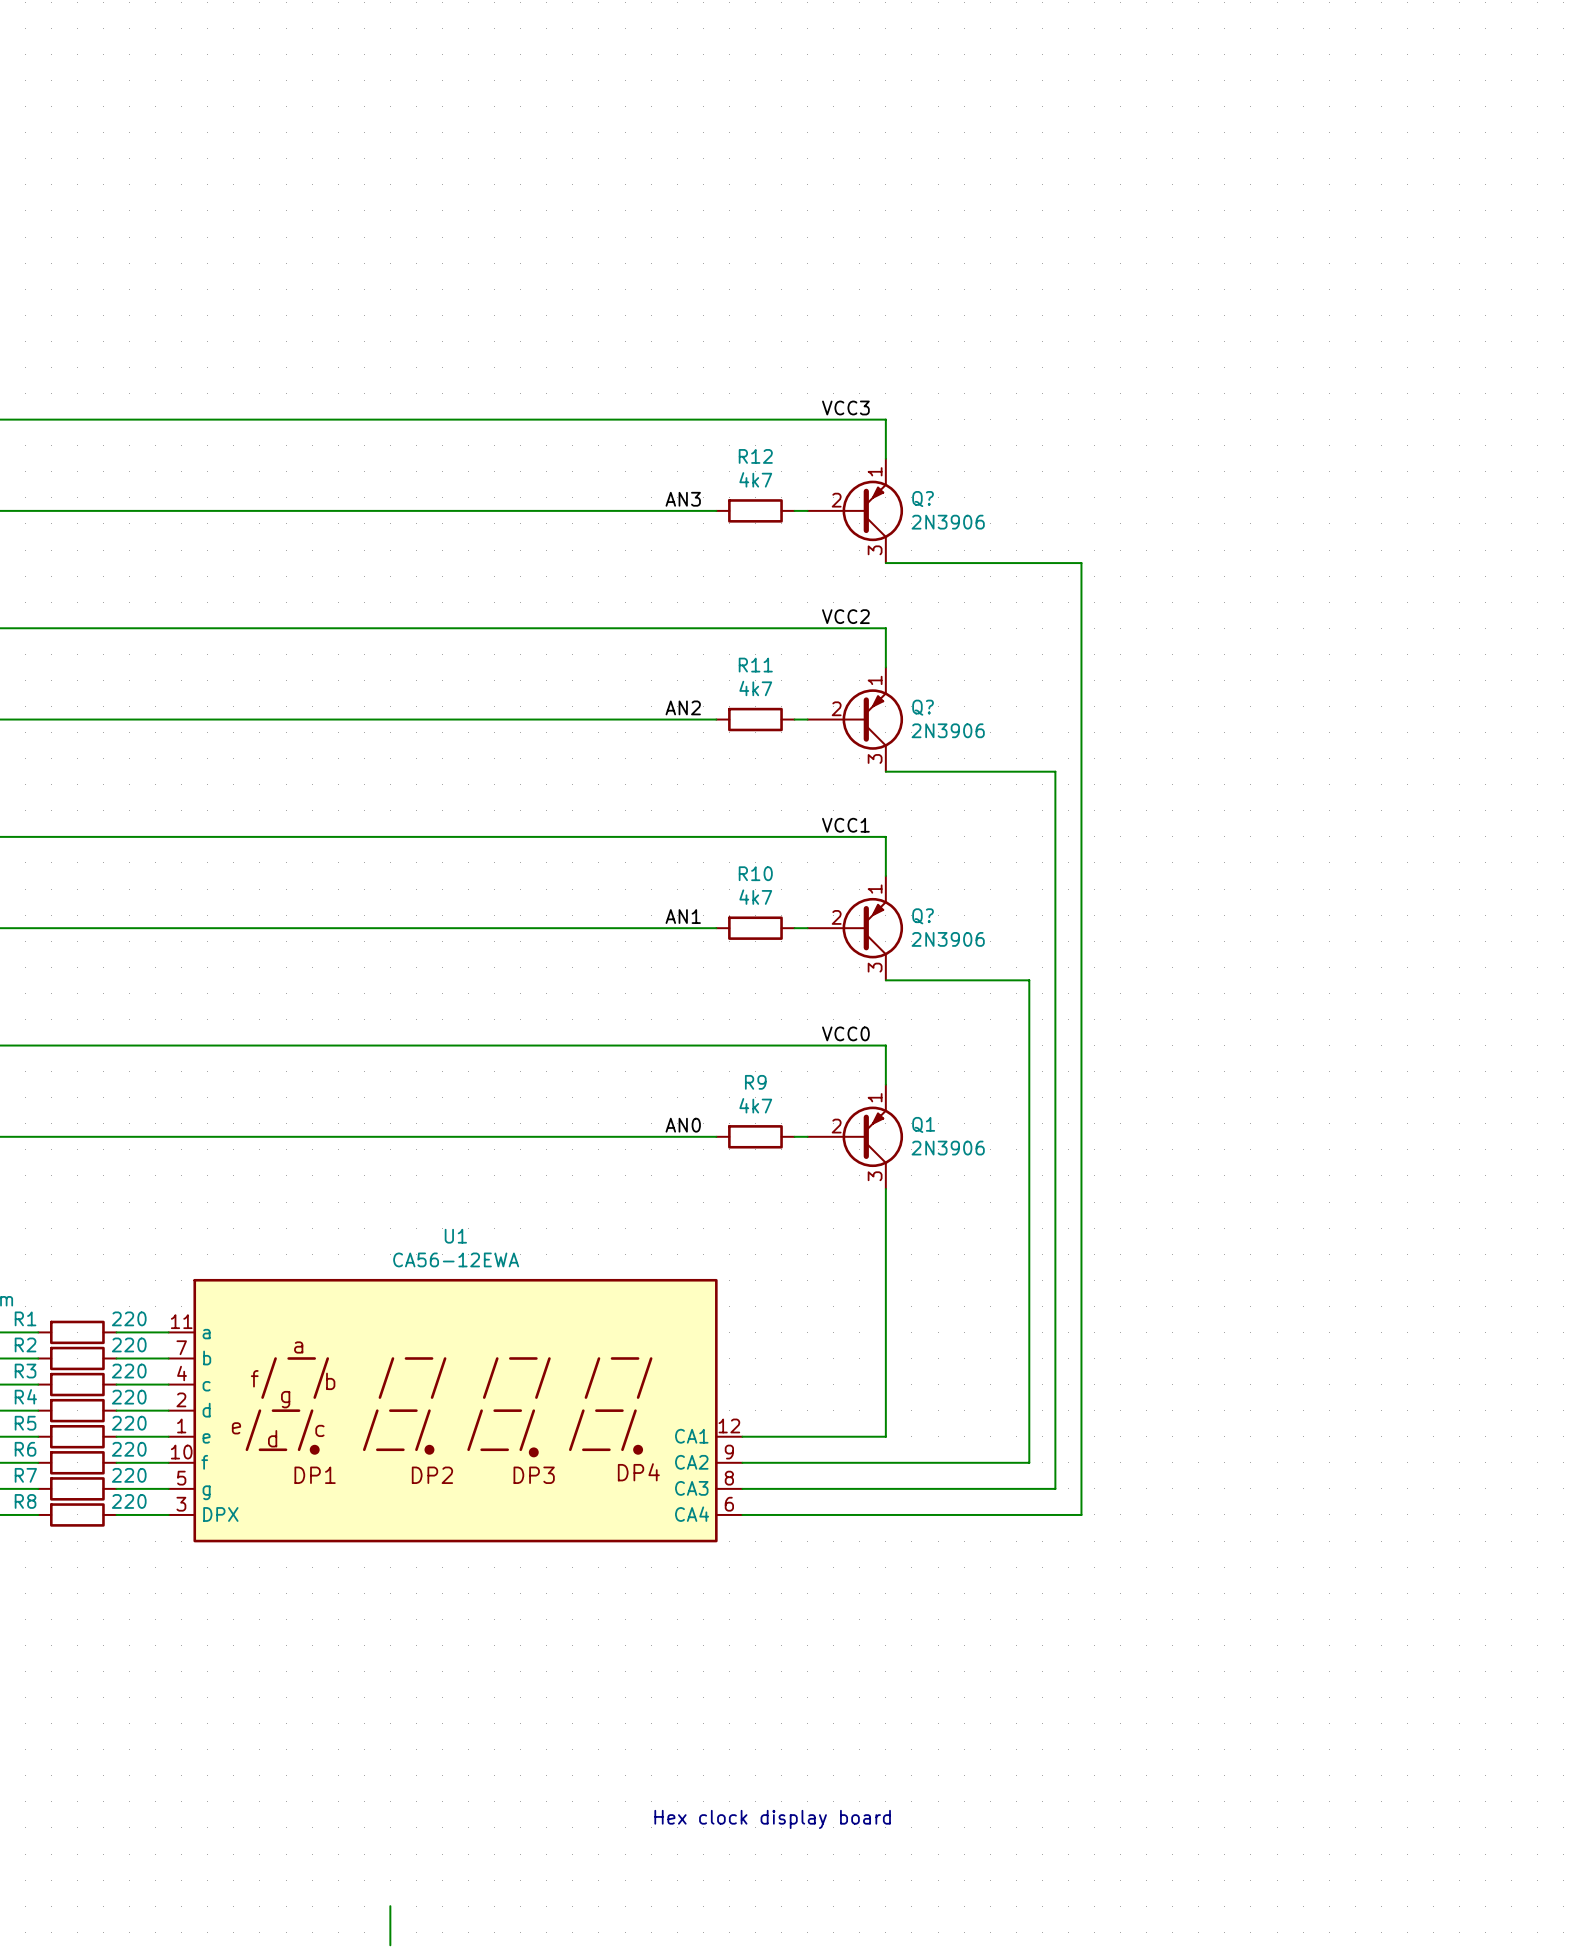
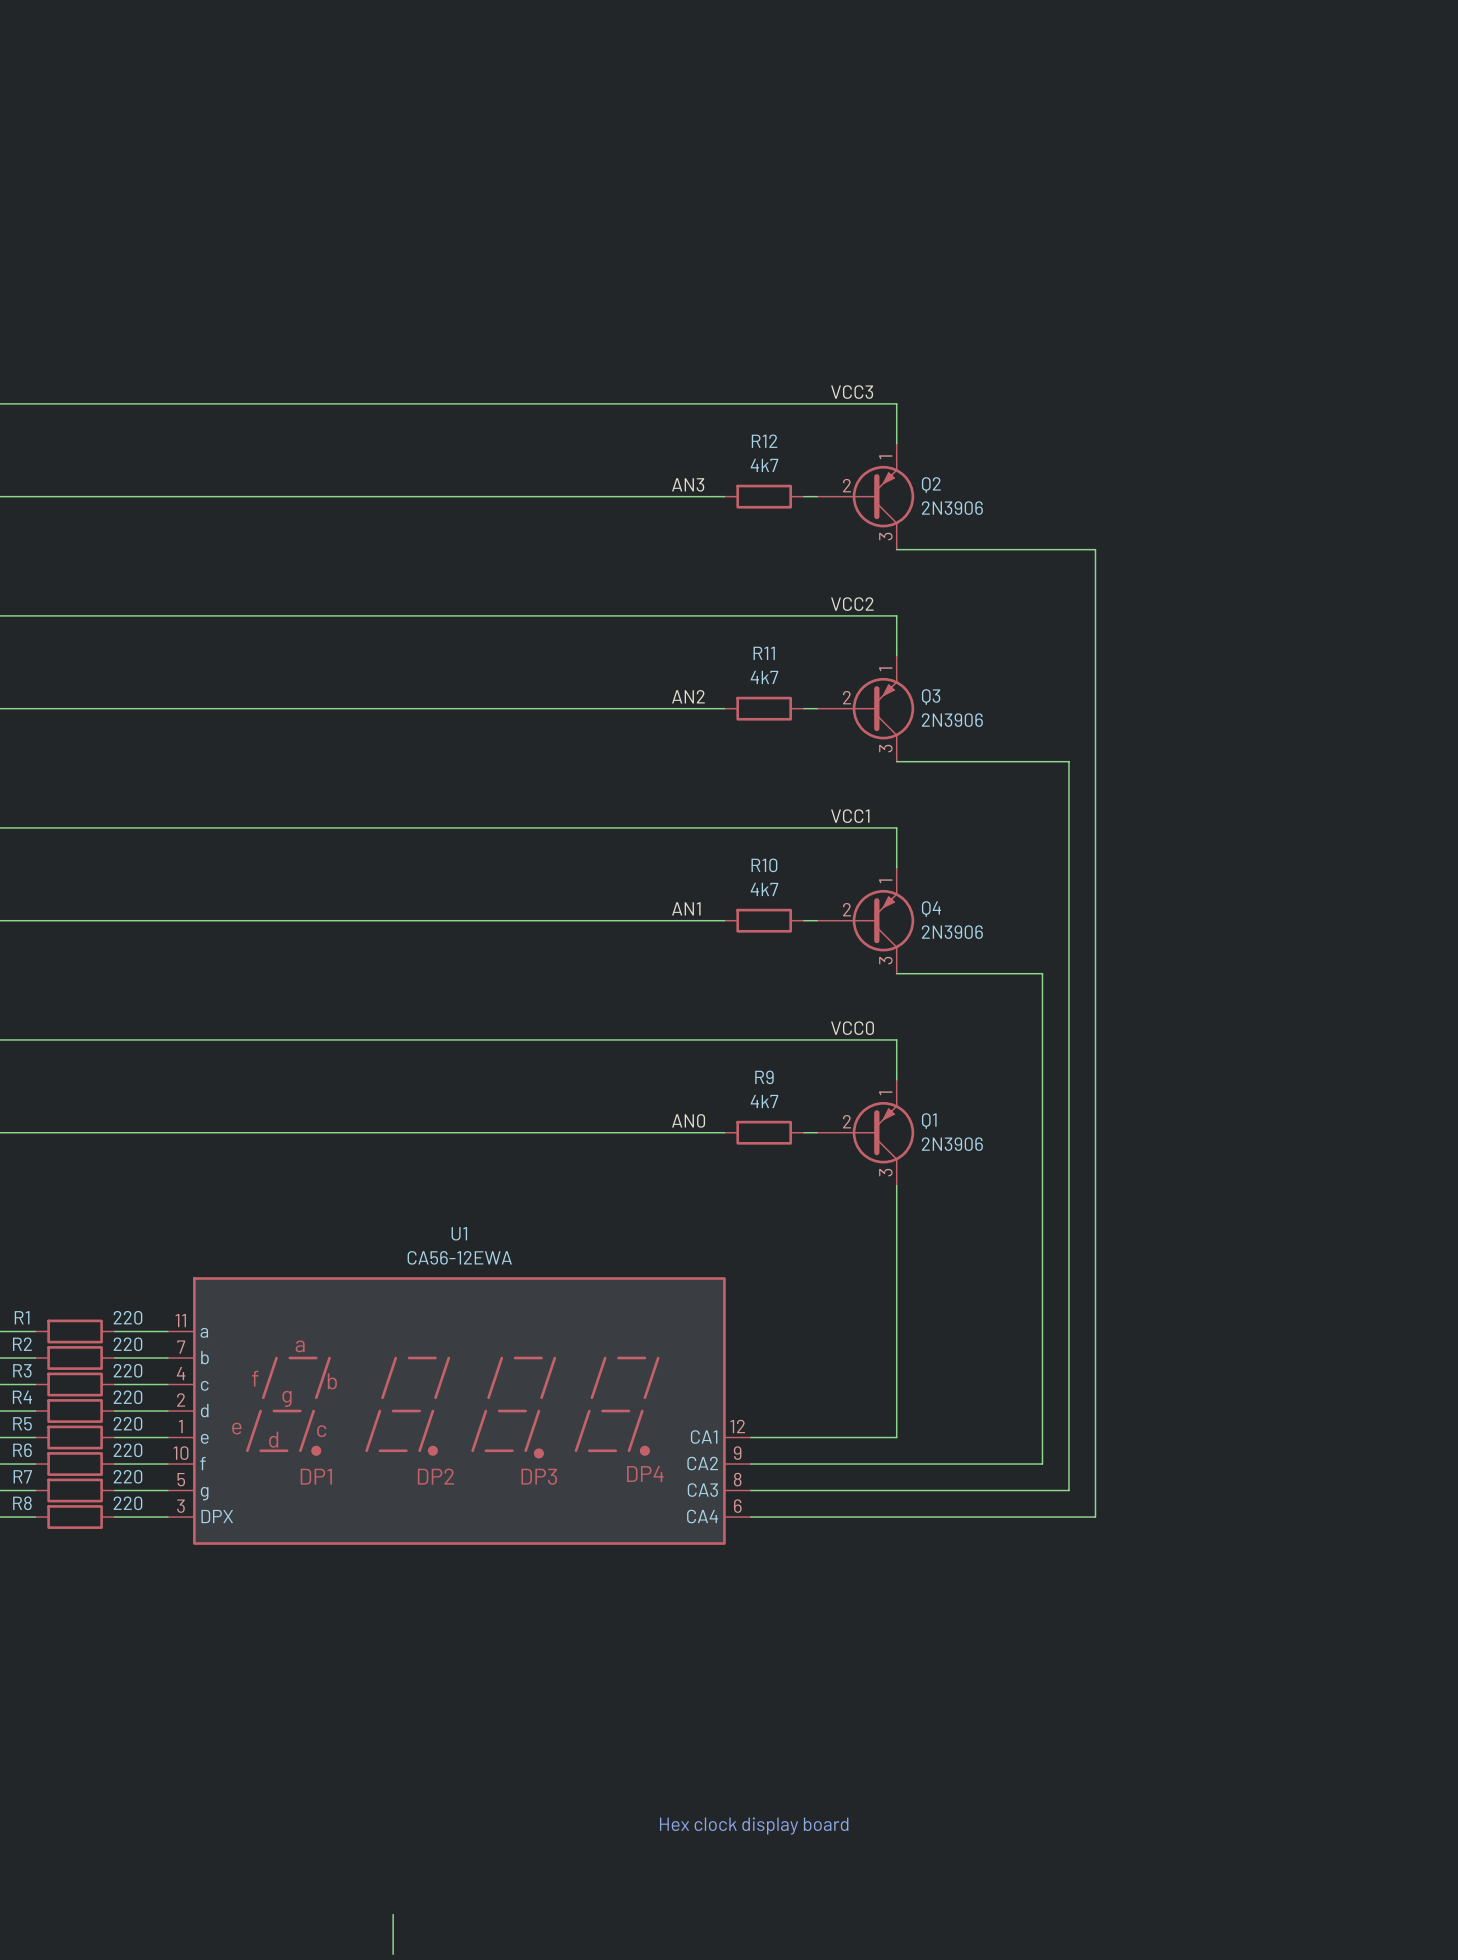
Q? name: Q? (923, 499) -> Q2 (931, 484)
Q? name: Q? (923, 707) -> Q3 (931, 697)
Q? name: Q? (923, 916) -> Q4 (931, 909)

